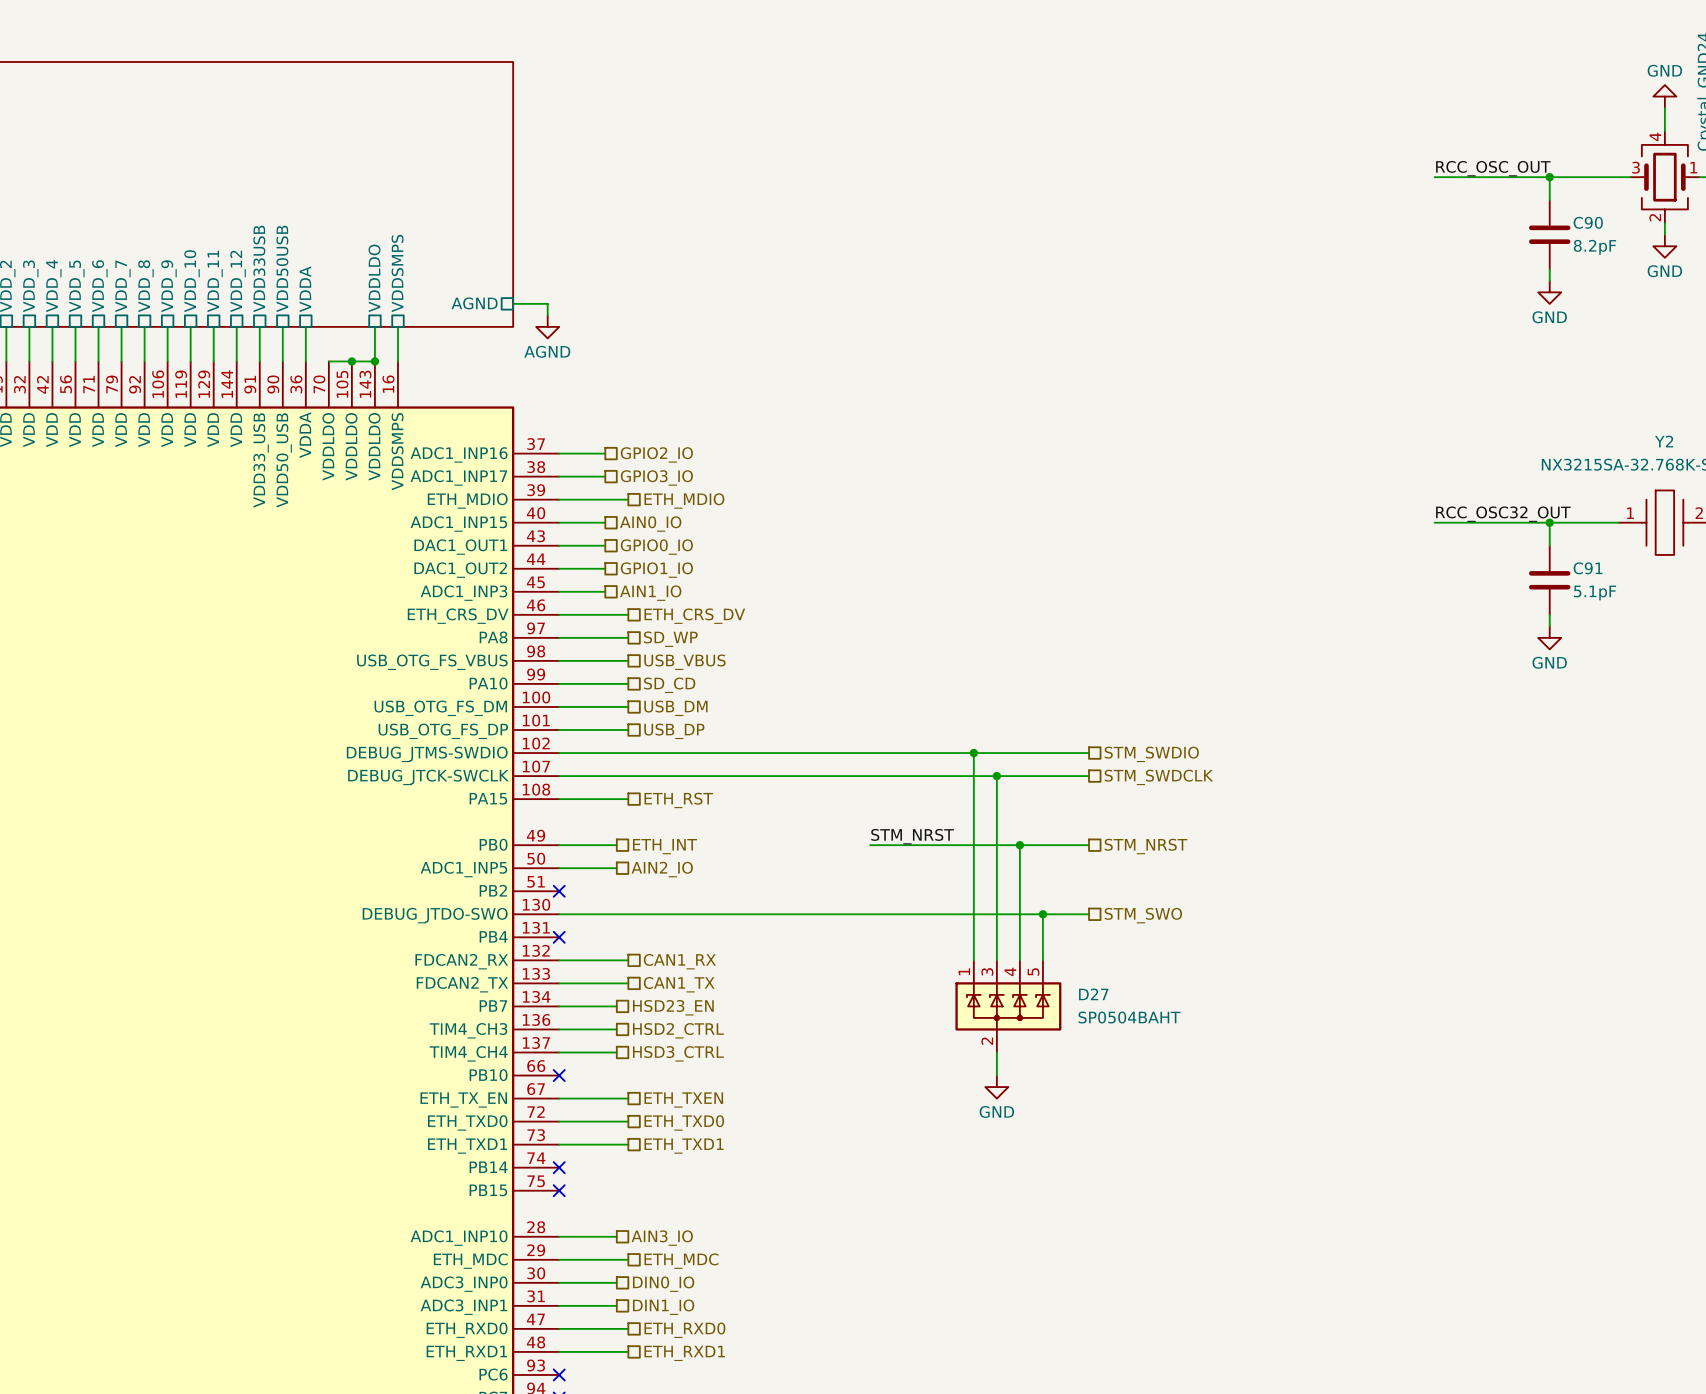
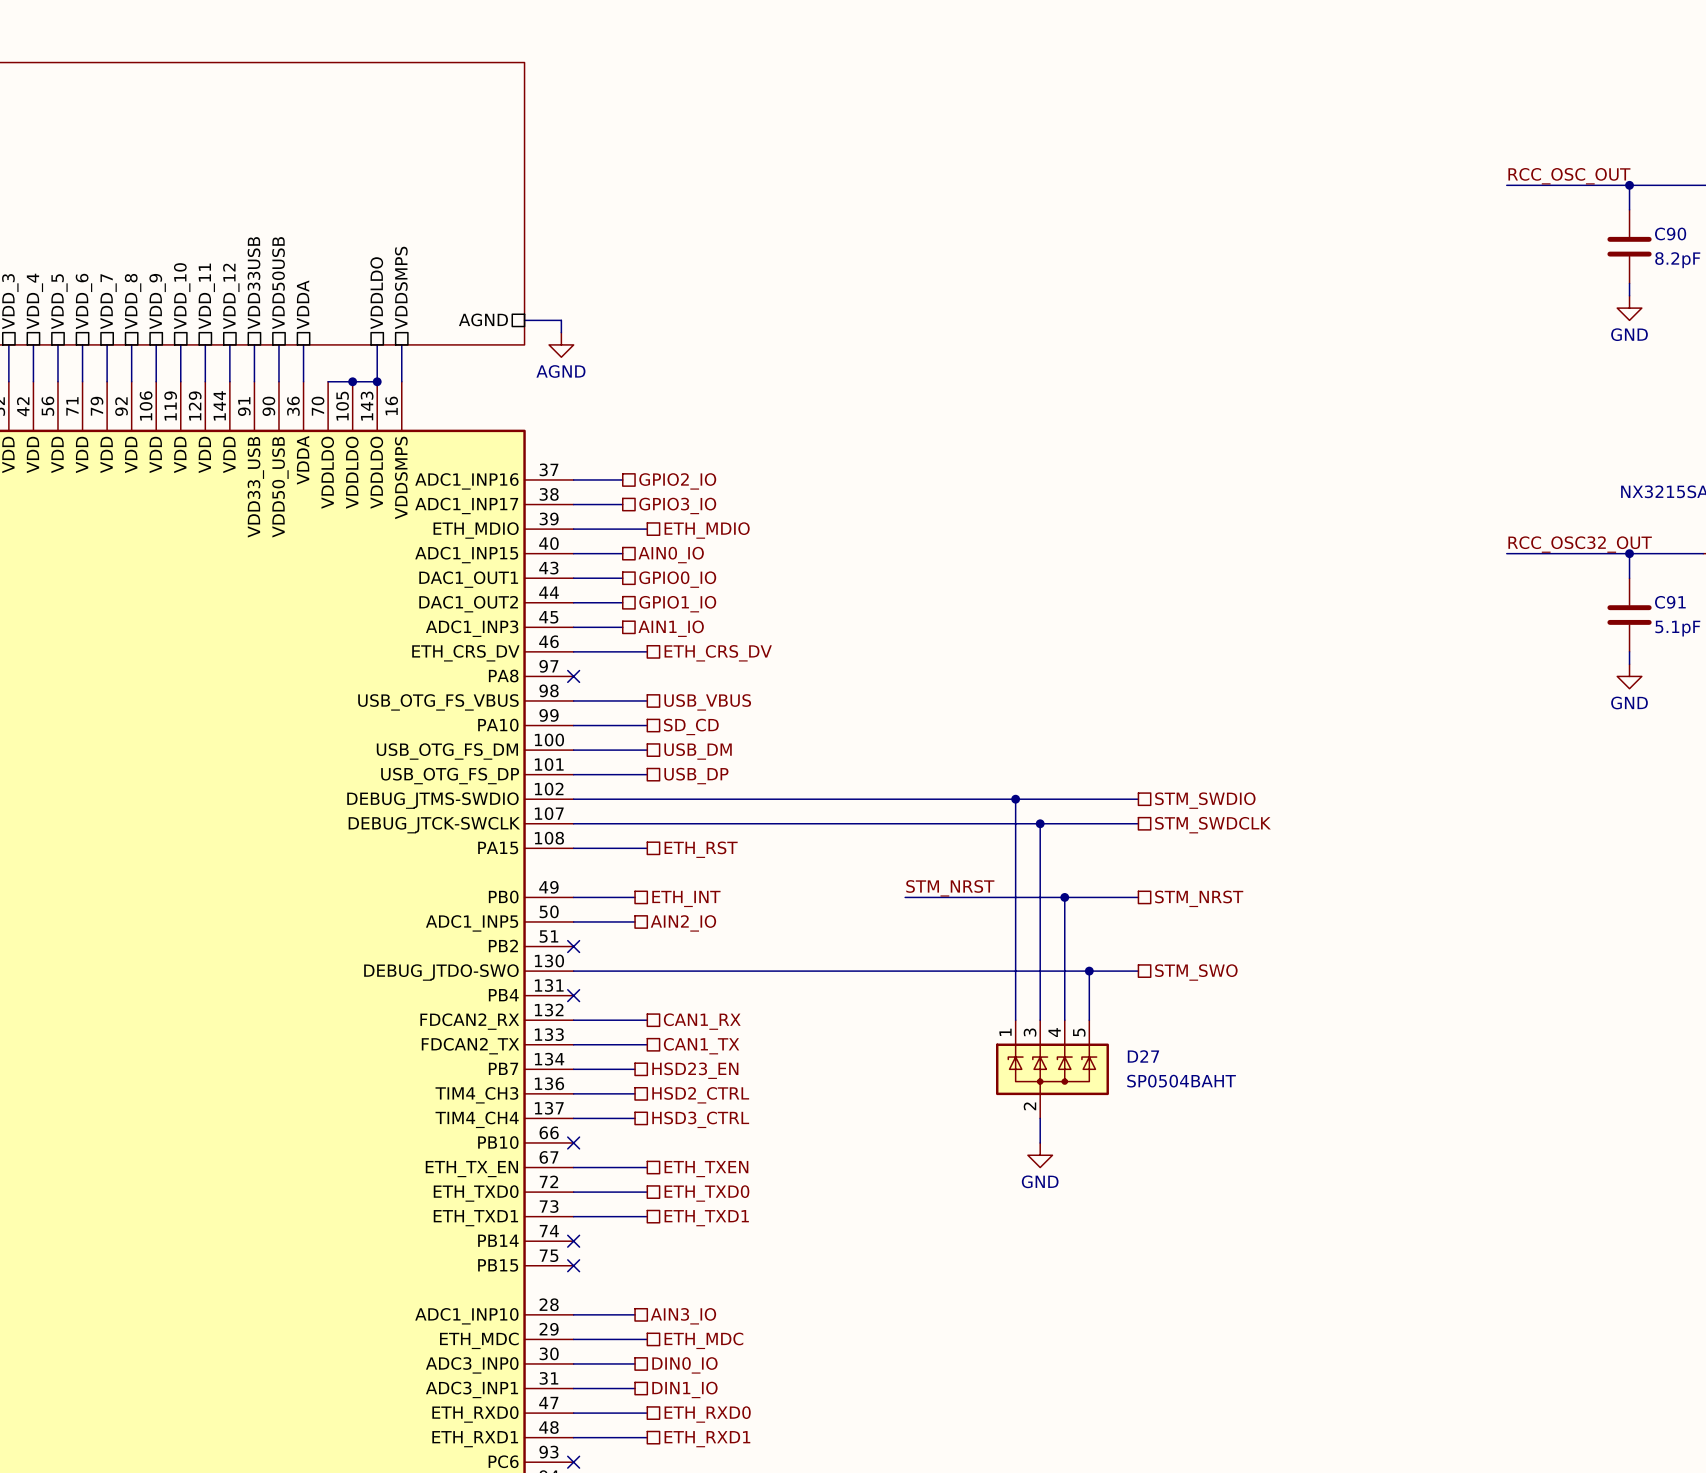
wire: (559, 637) (628, 637) -> none
no-connect mark: none -> (573, 676)
hierarchical label: SD_WP (670, 639) -> none

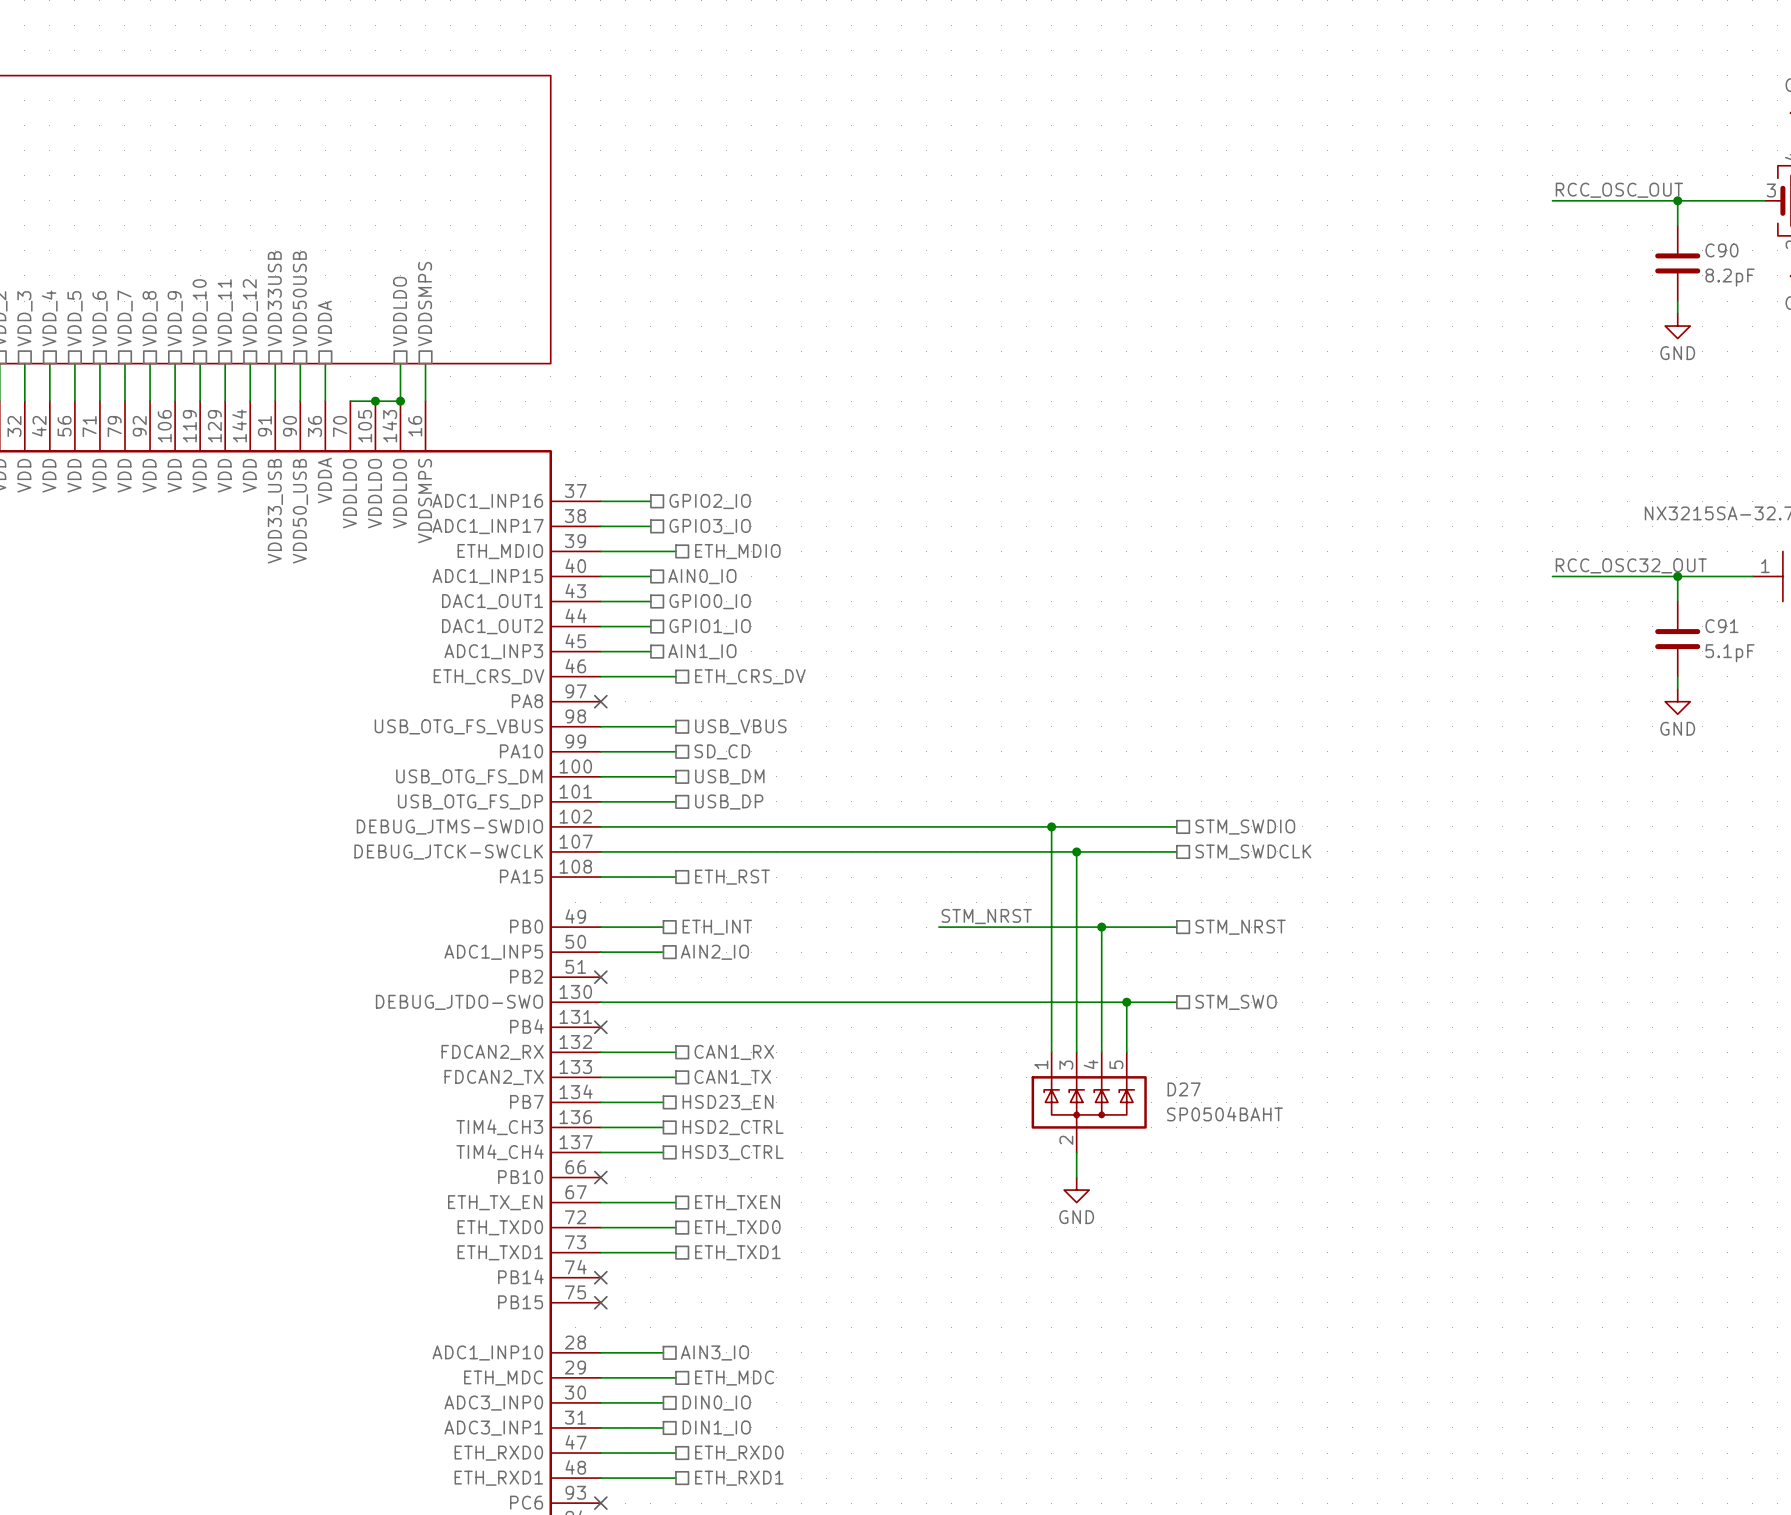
sheet pin: AGND (483, 319) -> none
wire: (524, 320) (561, 320) (561, 332) -> none
power symbol: AGND (561, 344) -> none

